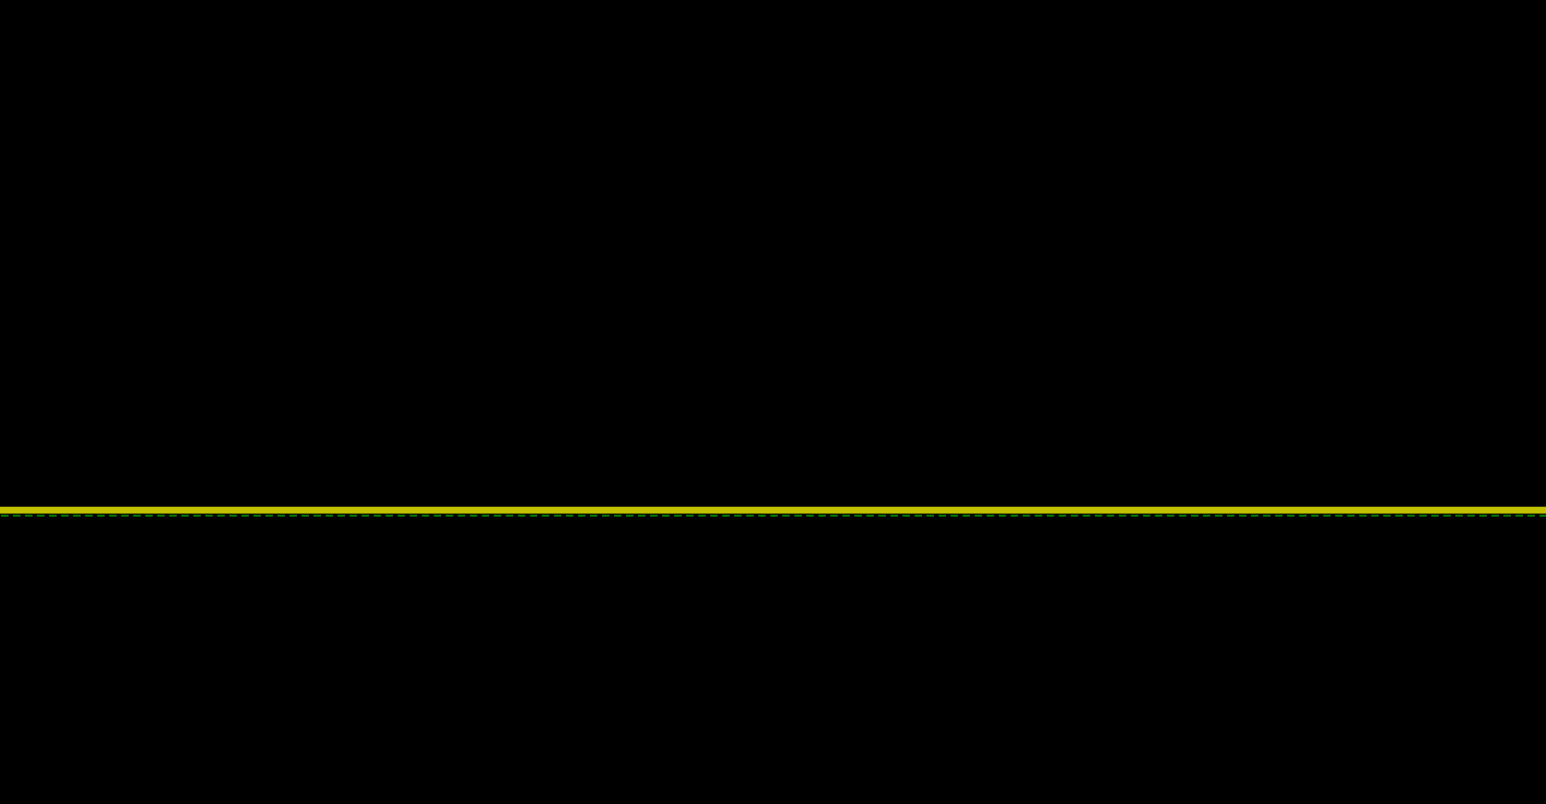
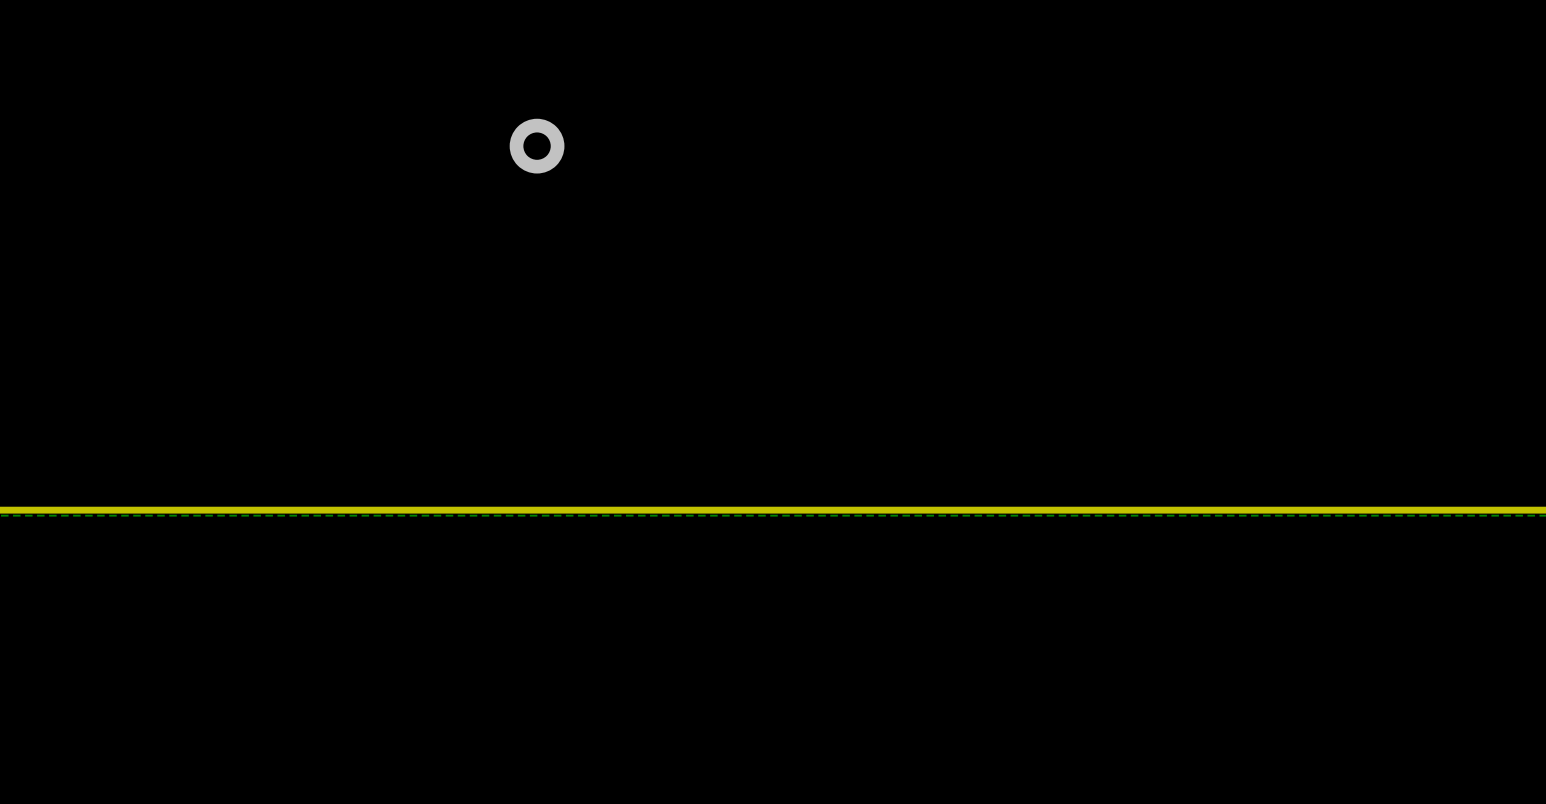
via: none -> (537, 146)

